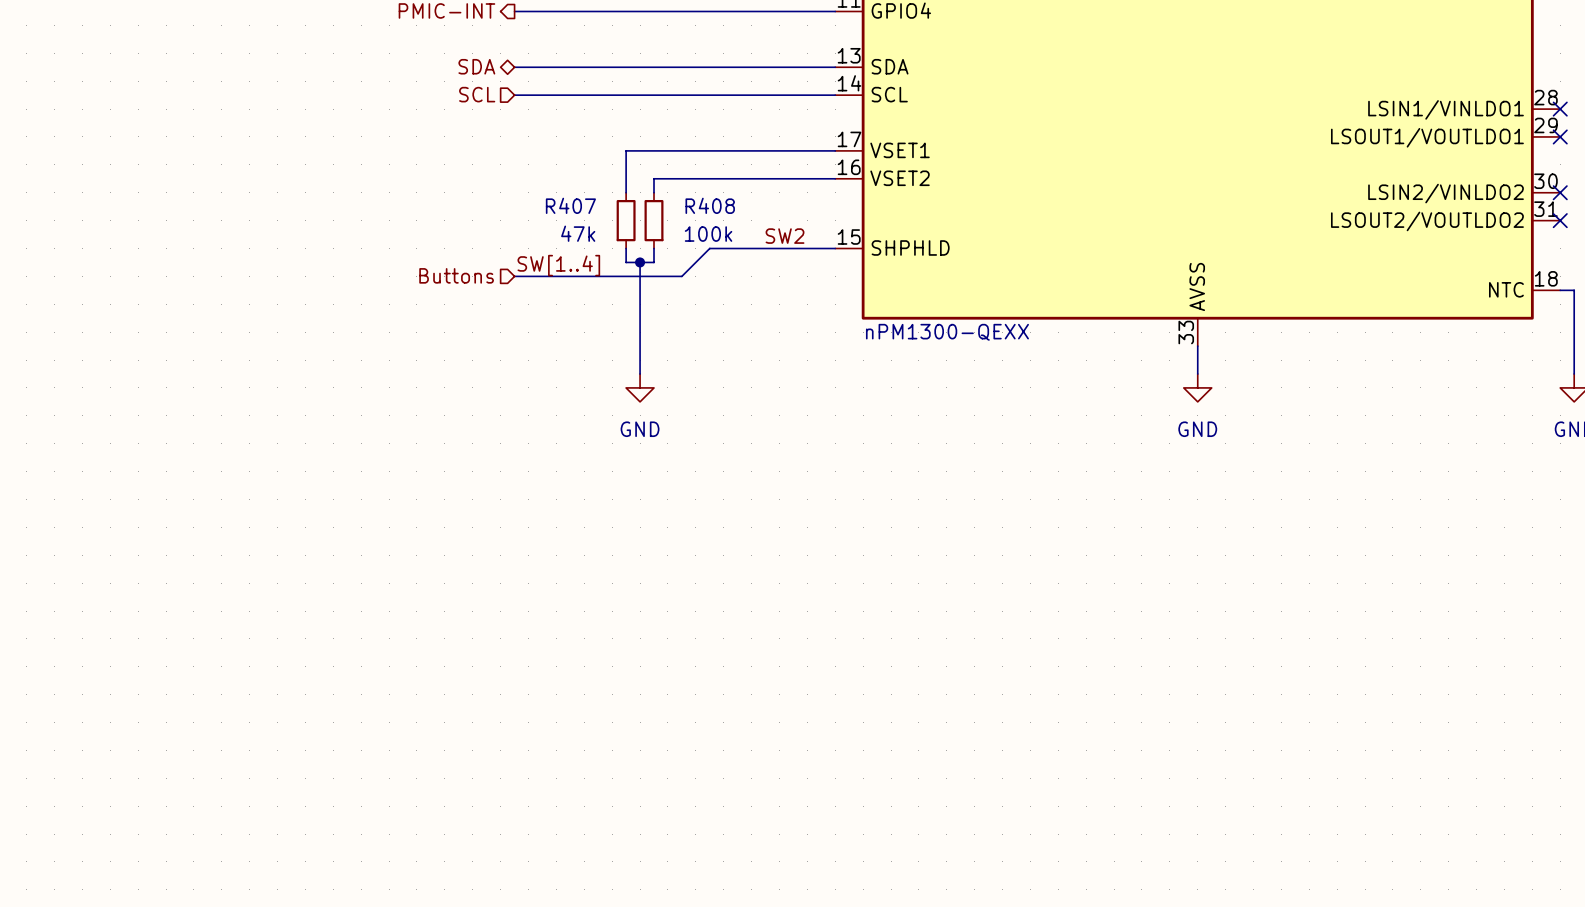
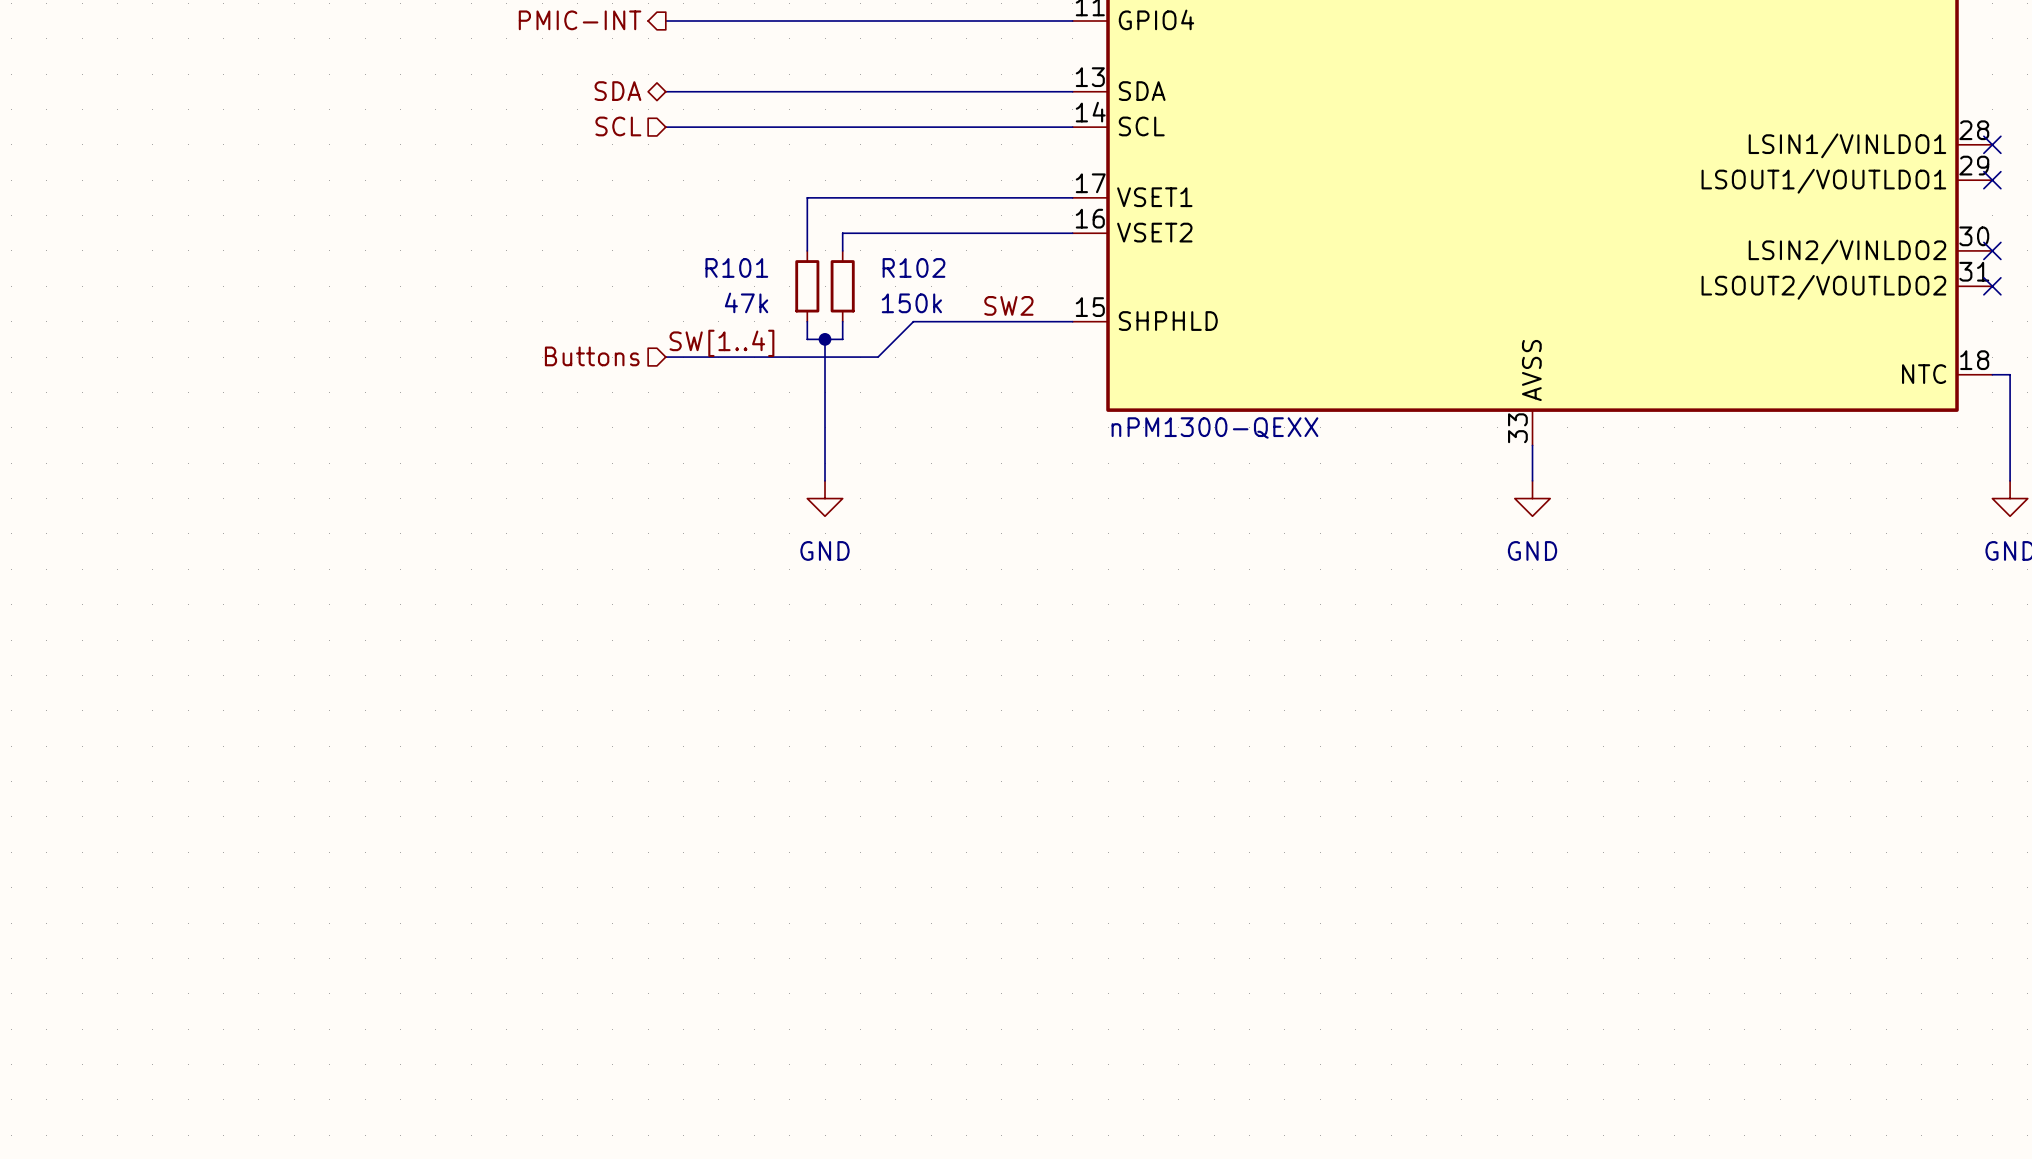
R407 name: R407 (570, 205) -> R101 (736, 267)
R408 name: R408 (710, 205) -> R102 (913, 267)
R408 value: 100k (708, 234) -> 150k (911, 303)

